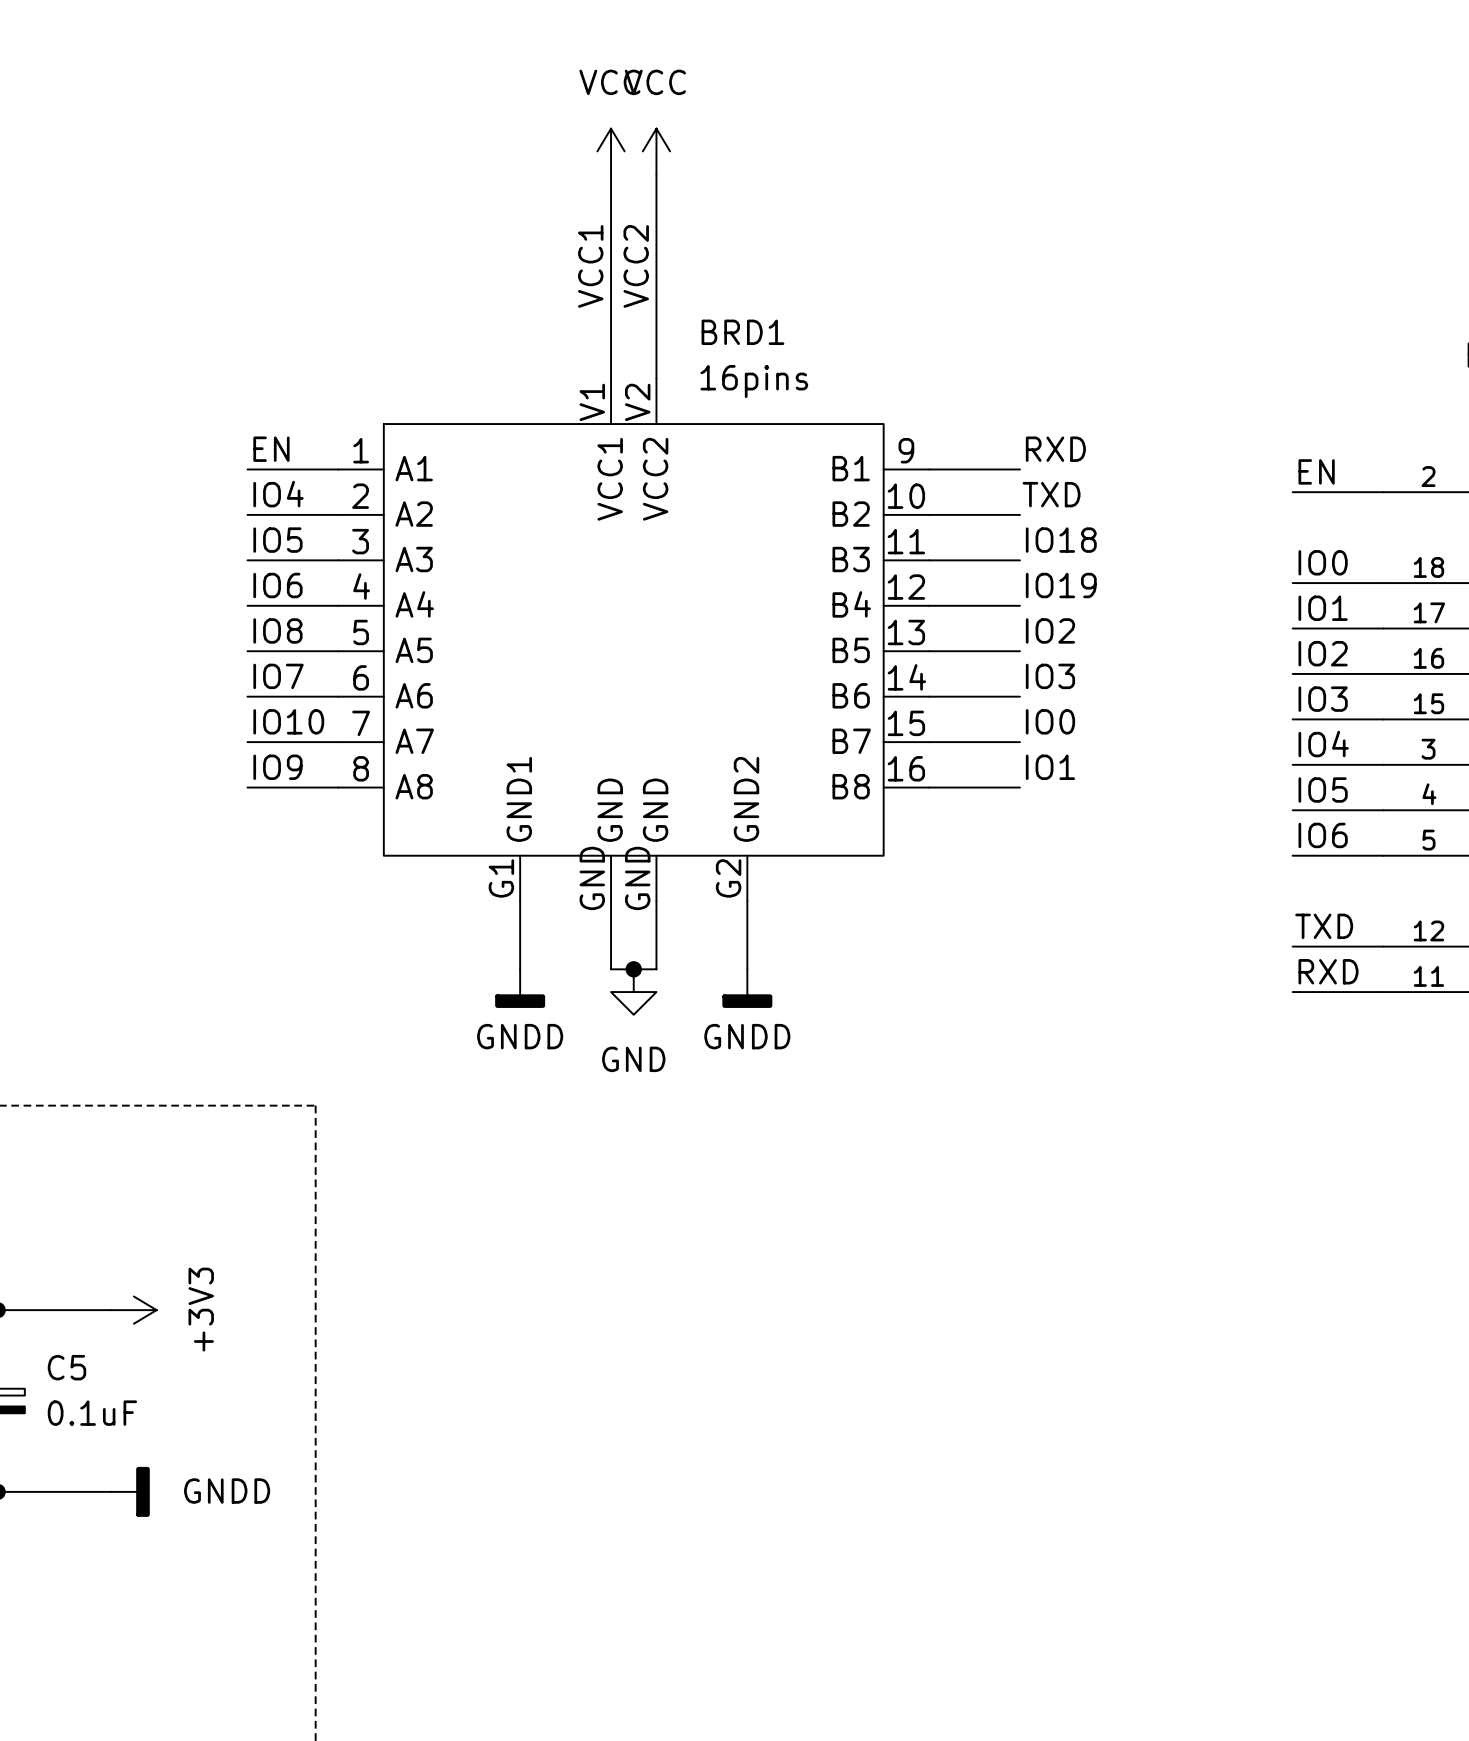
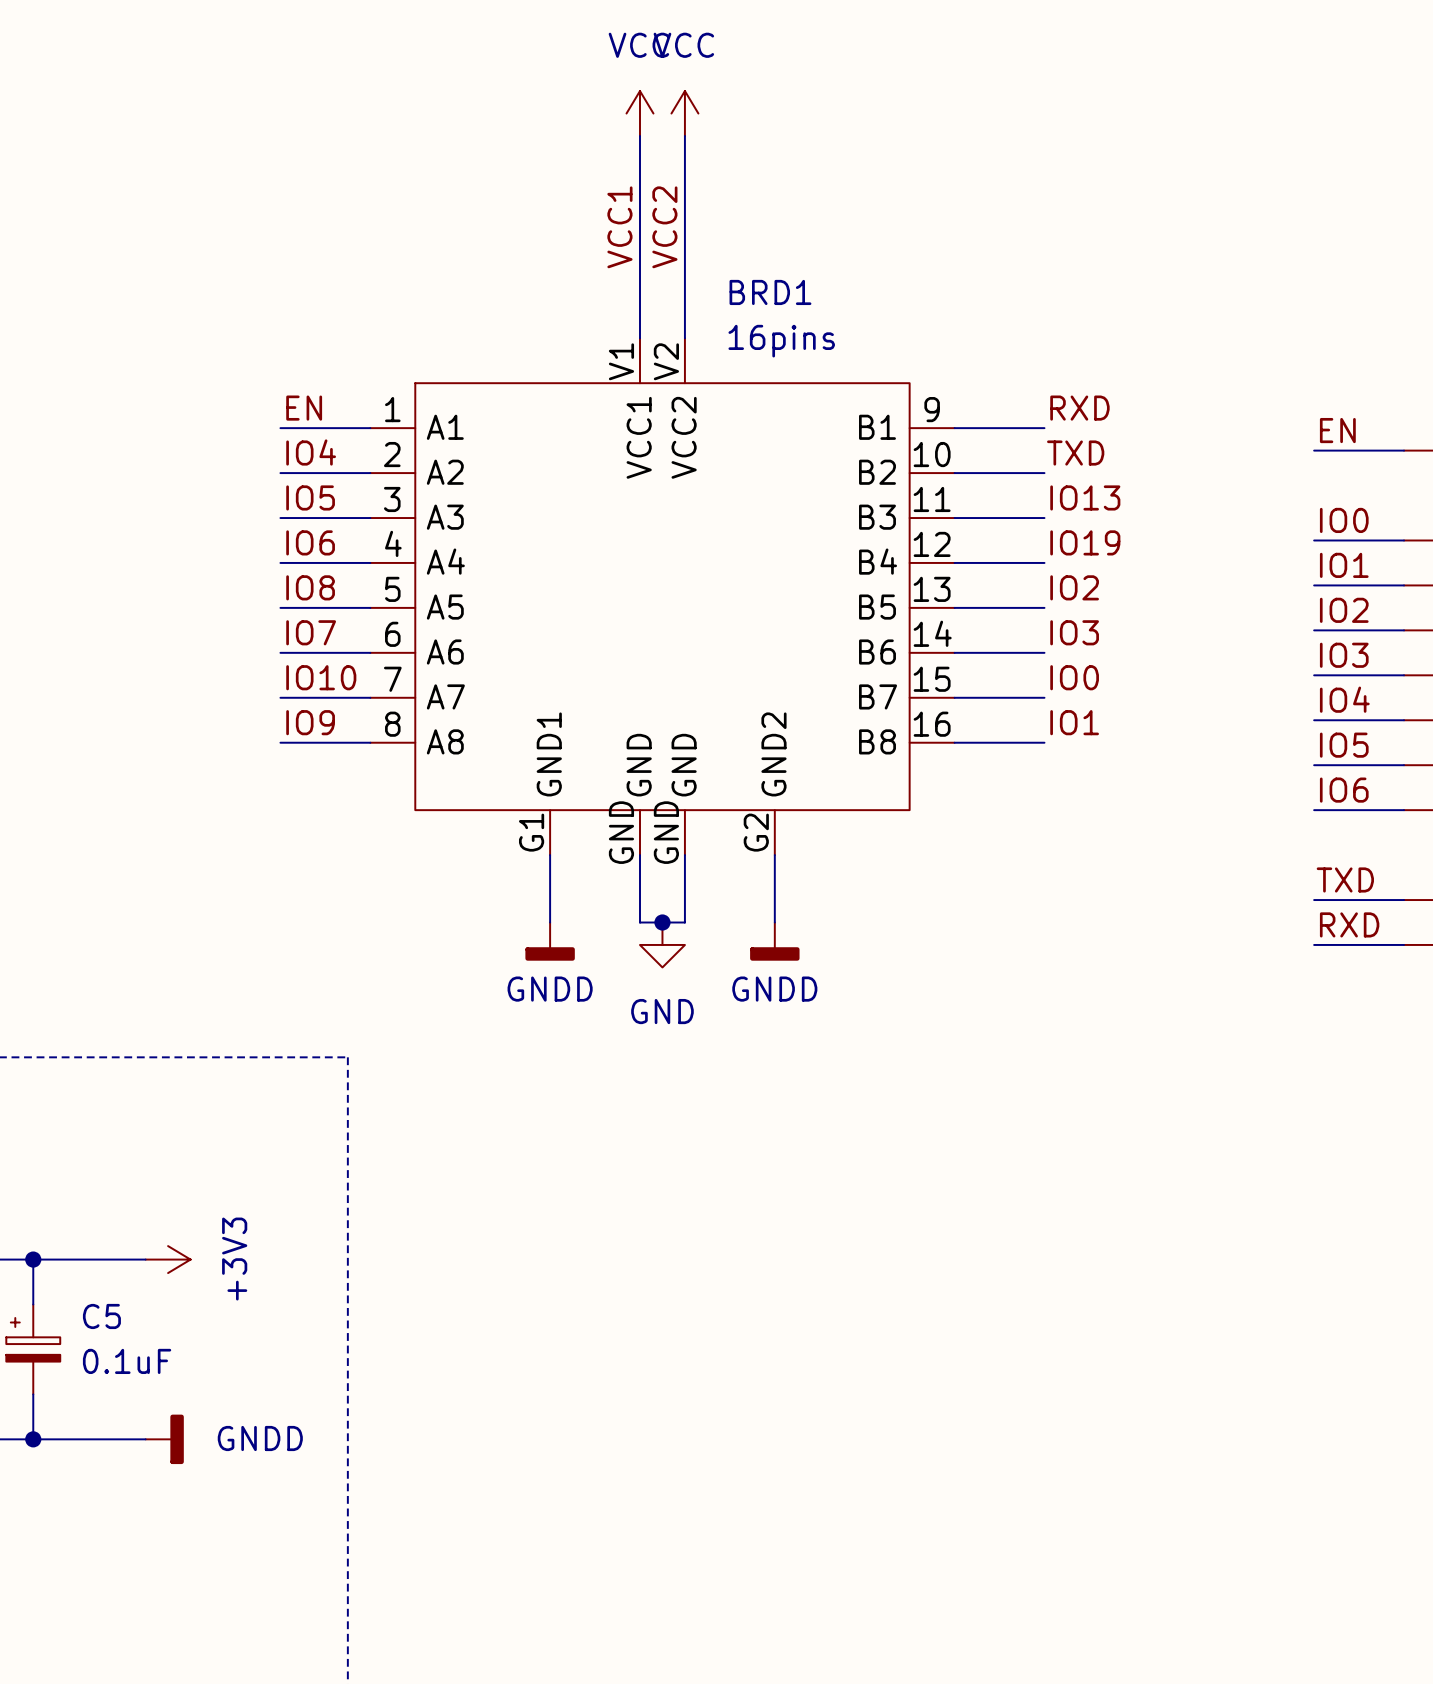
label: IO18 (1061, 540) -> IO13 (1085, 497)

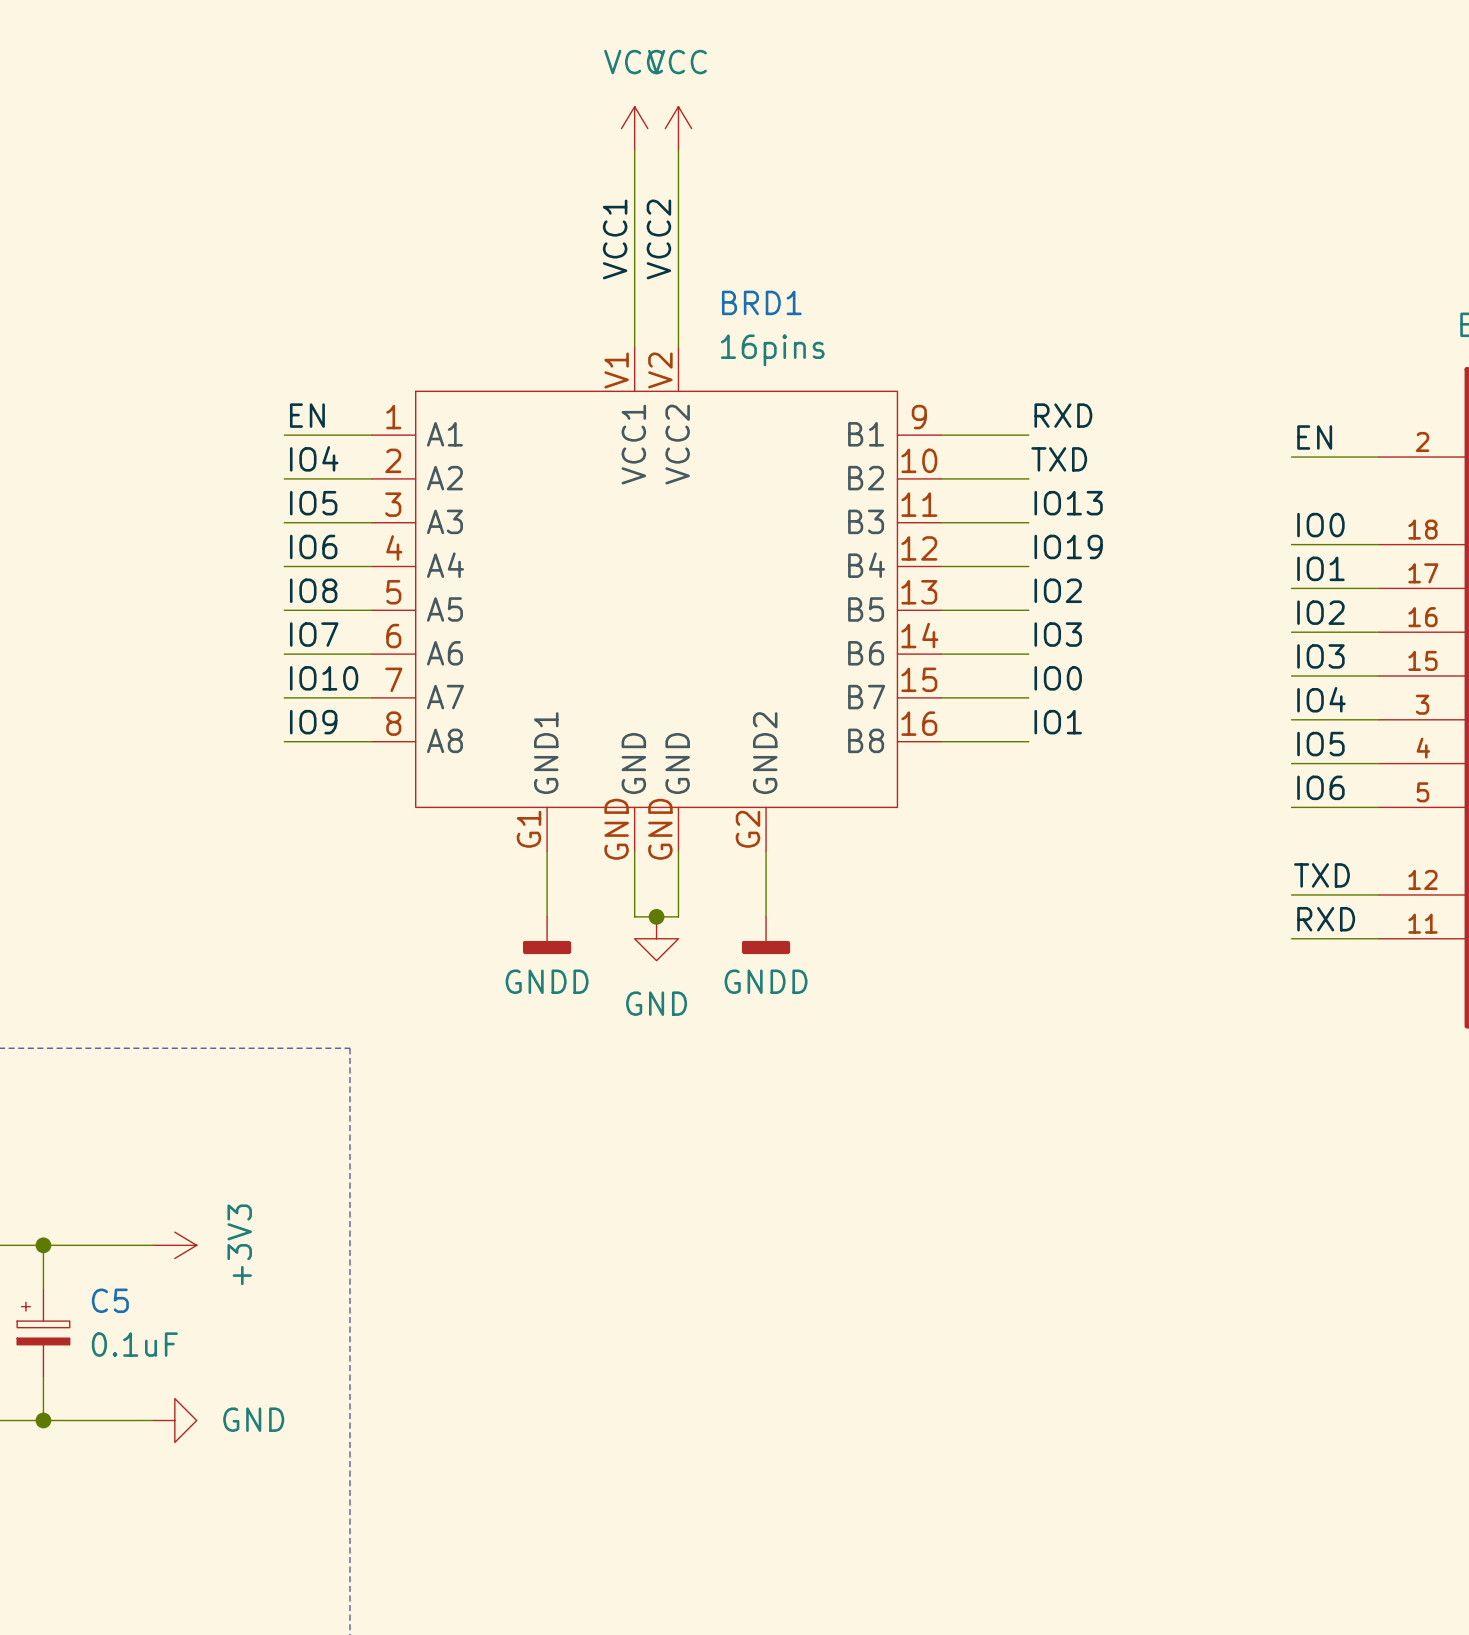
power symbol: GNDD (164, 1439) -> GND (174, 1420)

